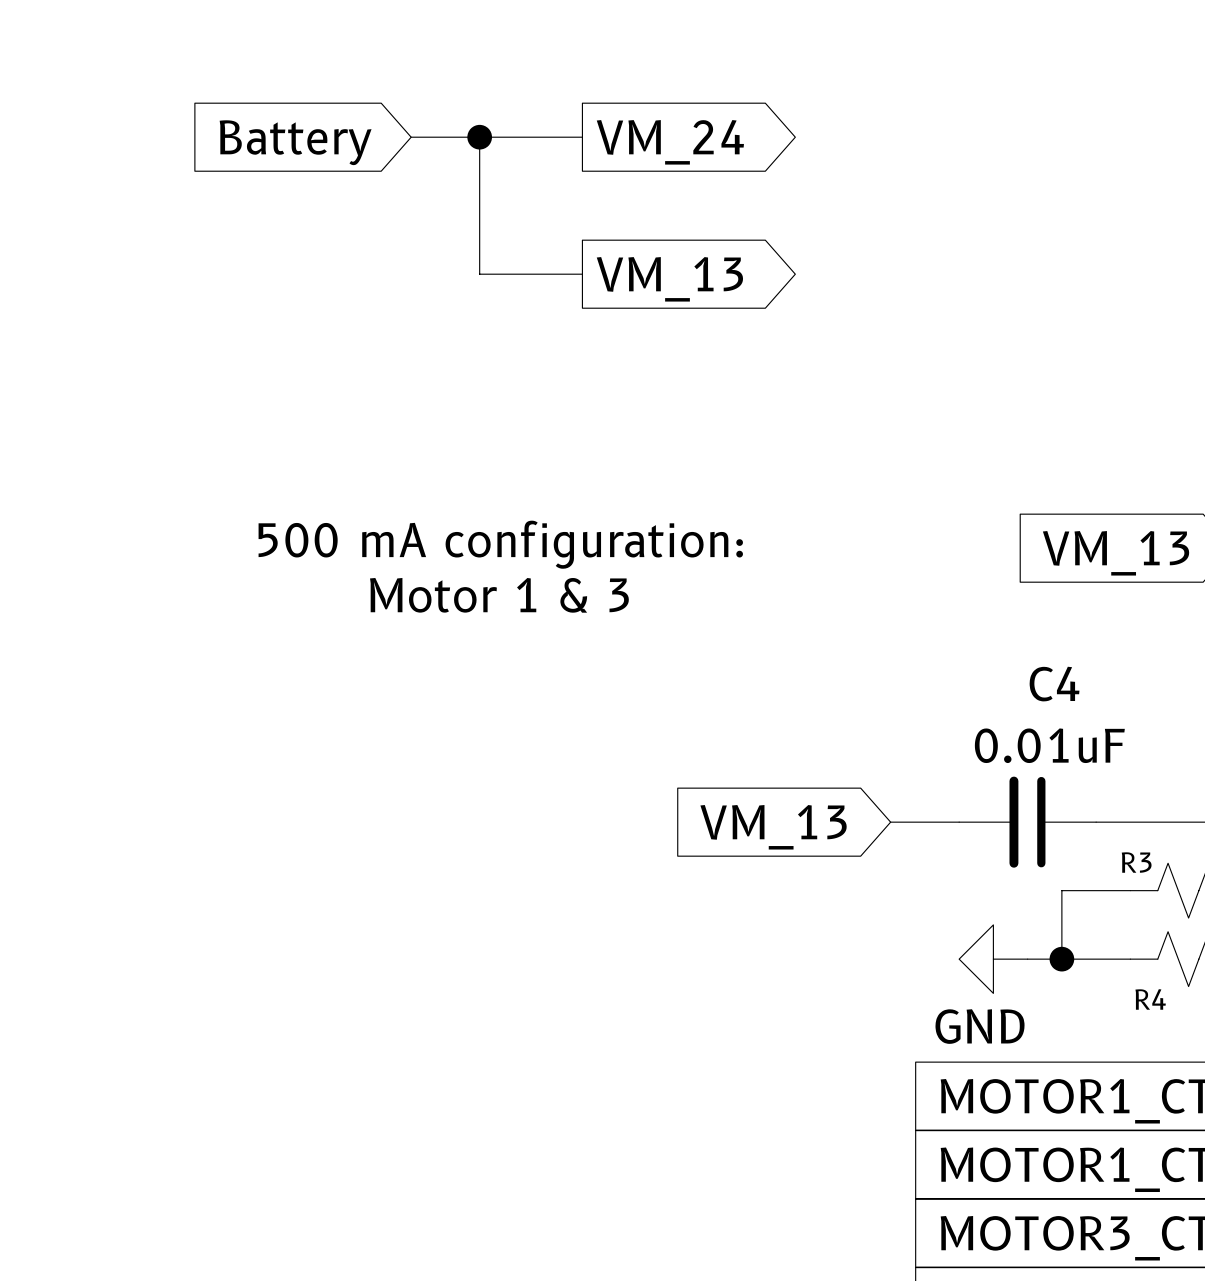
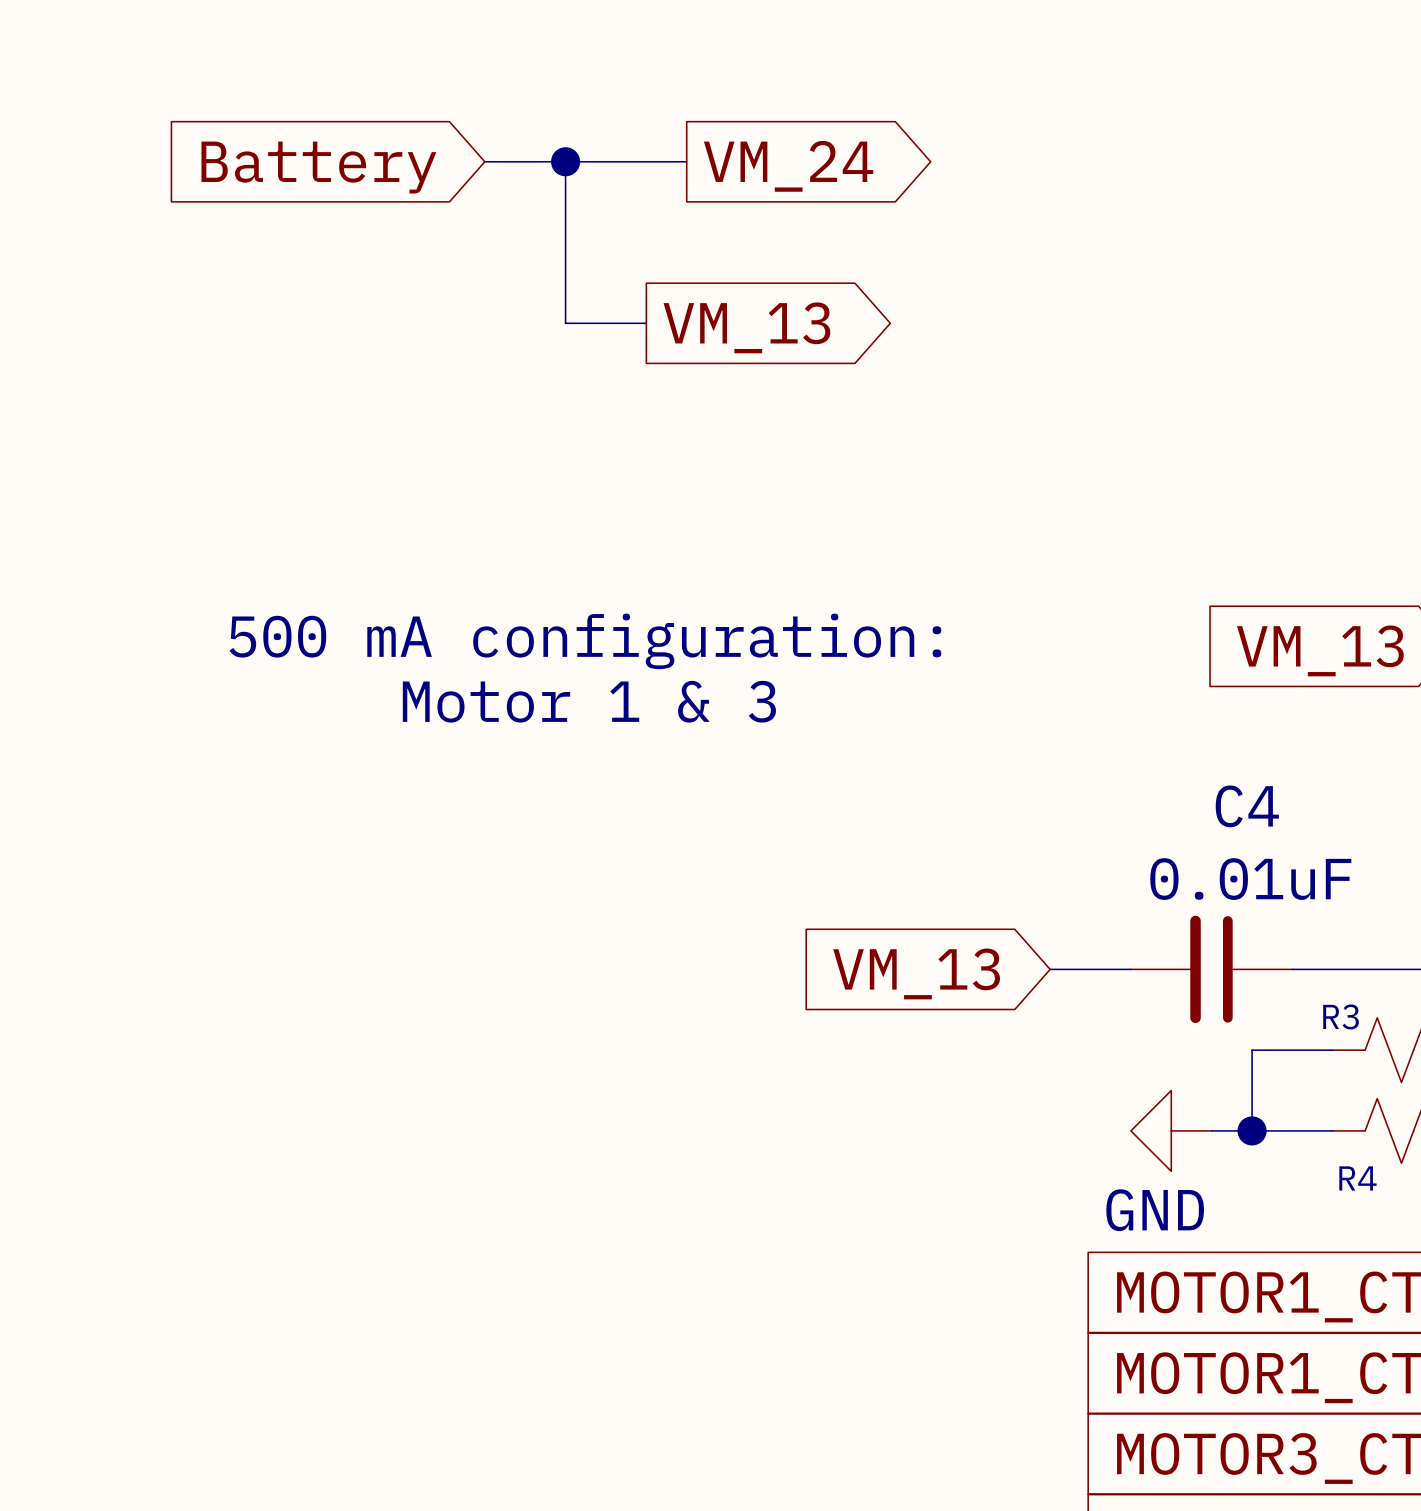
wire: (548, 274) (582, 274) -> none
global label position: VM_13 (669, 279) -> VM_13 (746, 327)

